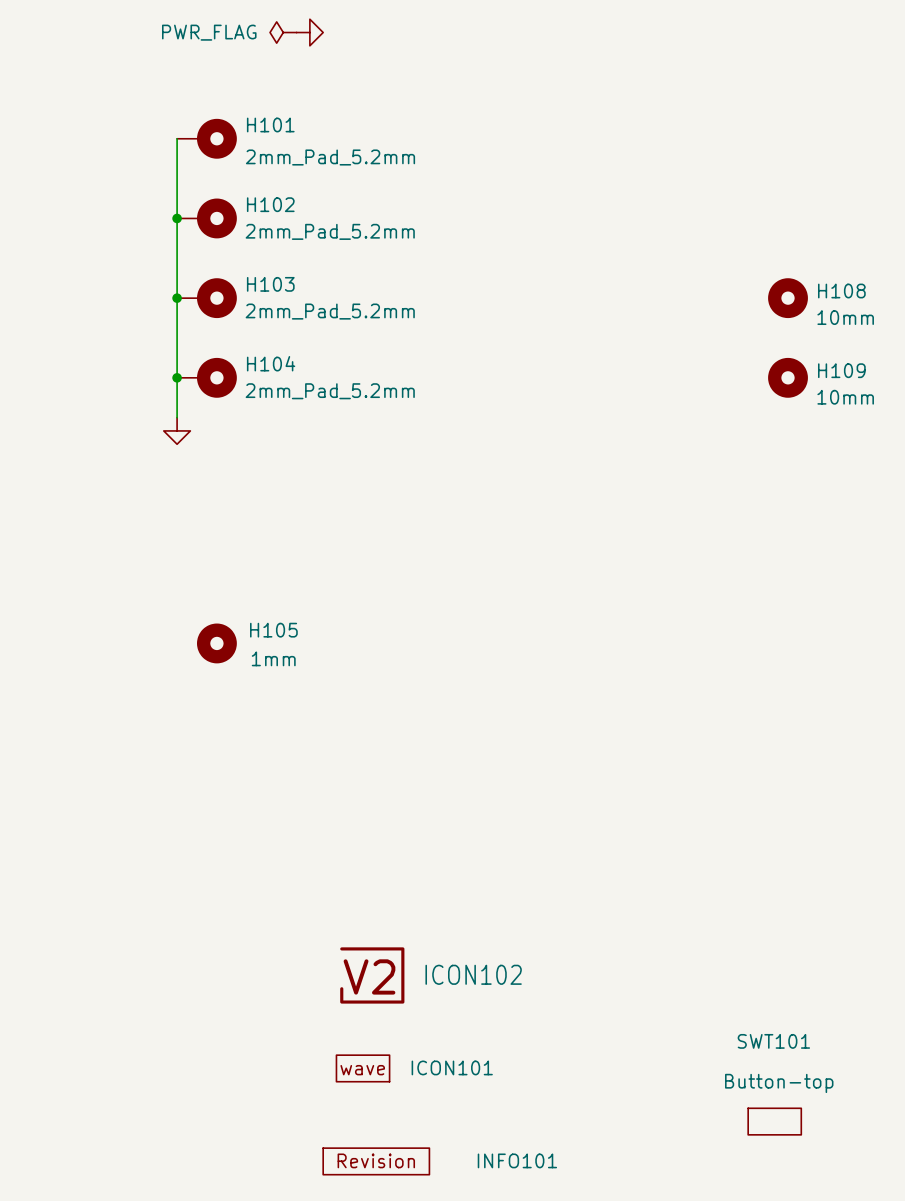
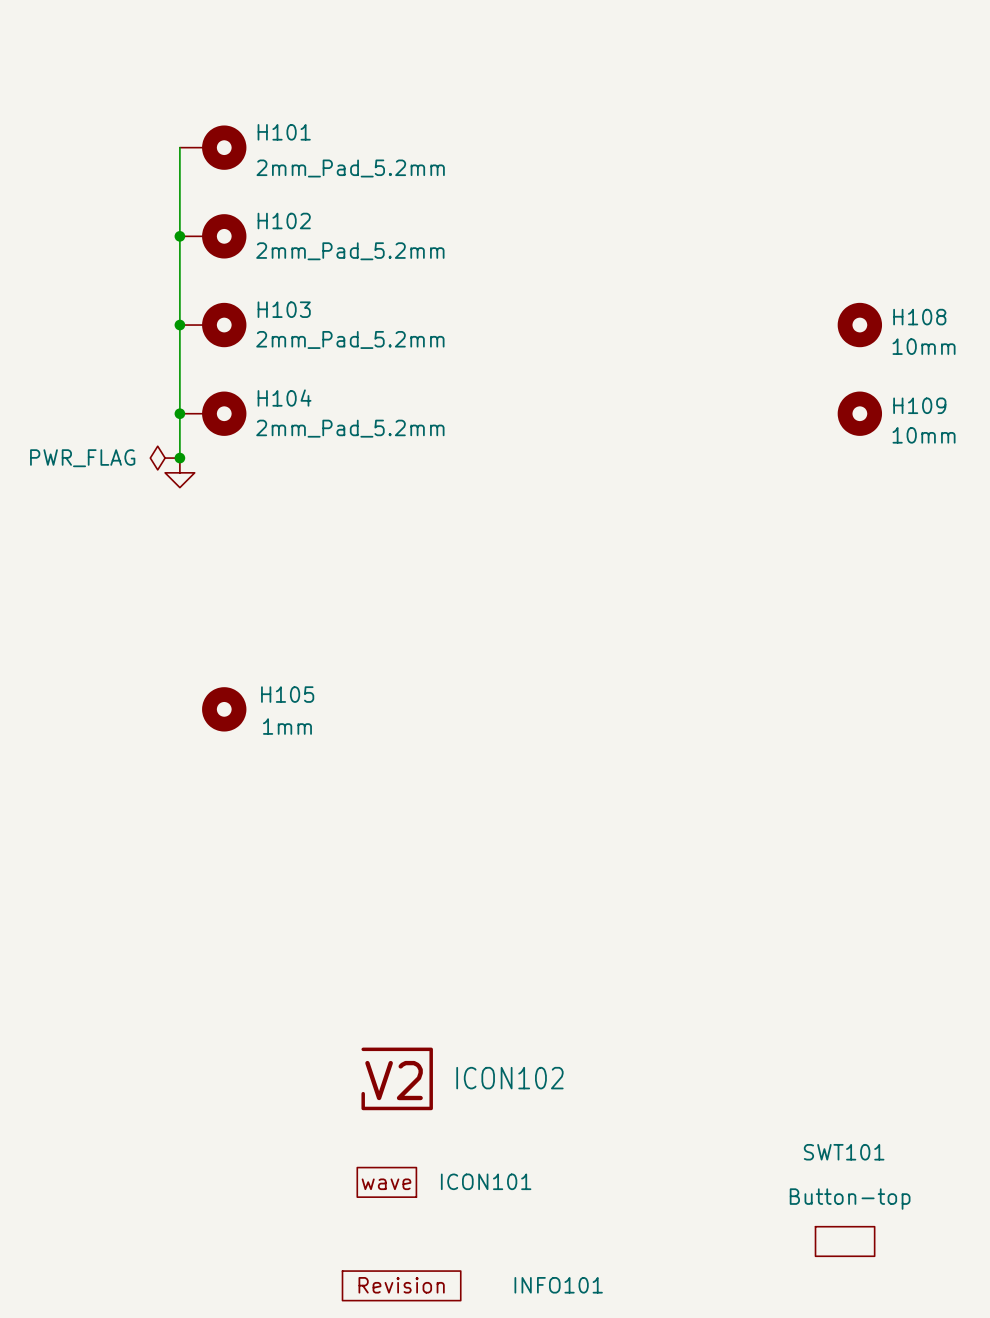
power symbol: PWR_FLAG (283, 32) -> none
power symbol: (309, 32) -> none
power symbol: none -> PWR_FLAG (165, 458)
junction: none -> (179, 458)

